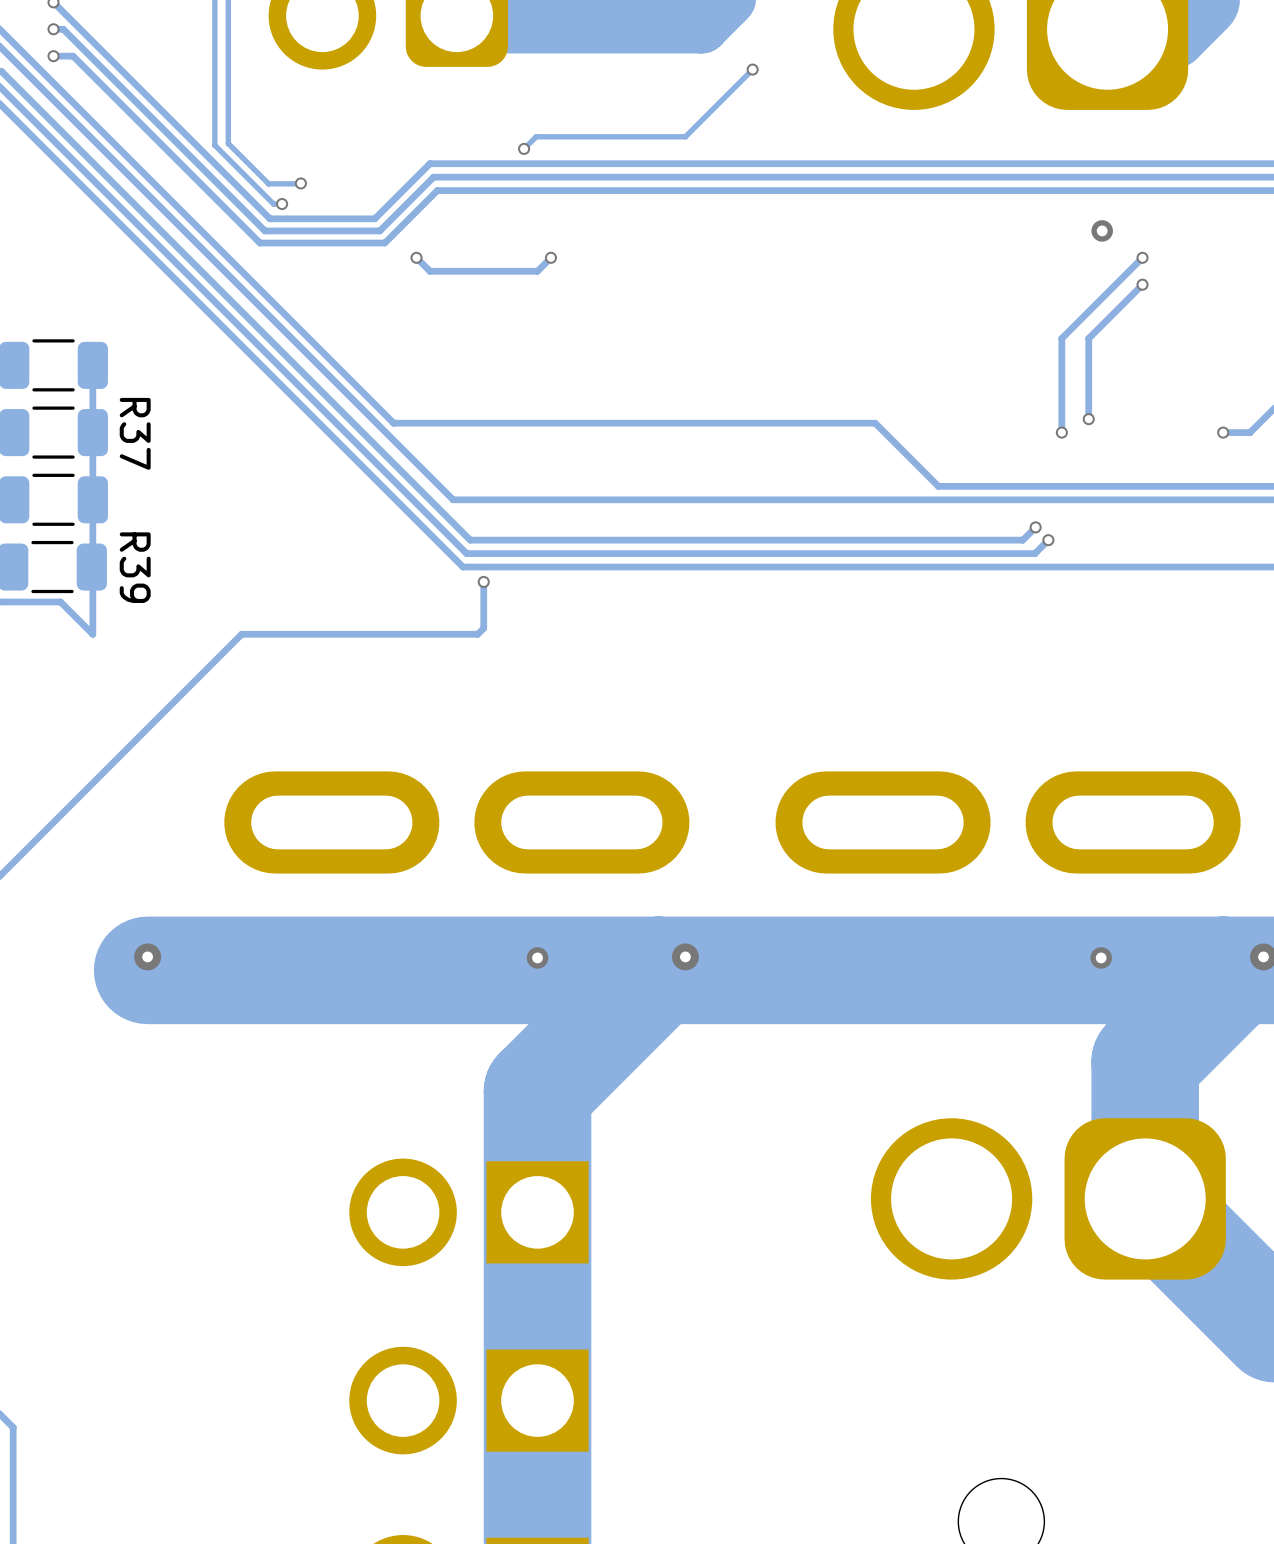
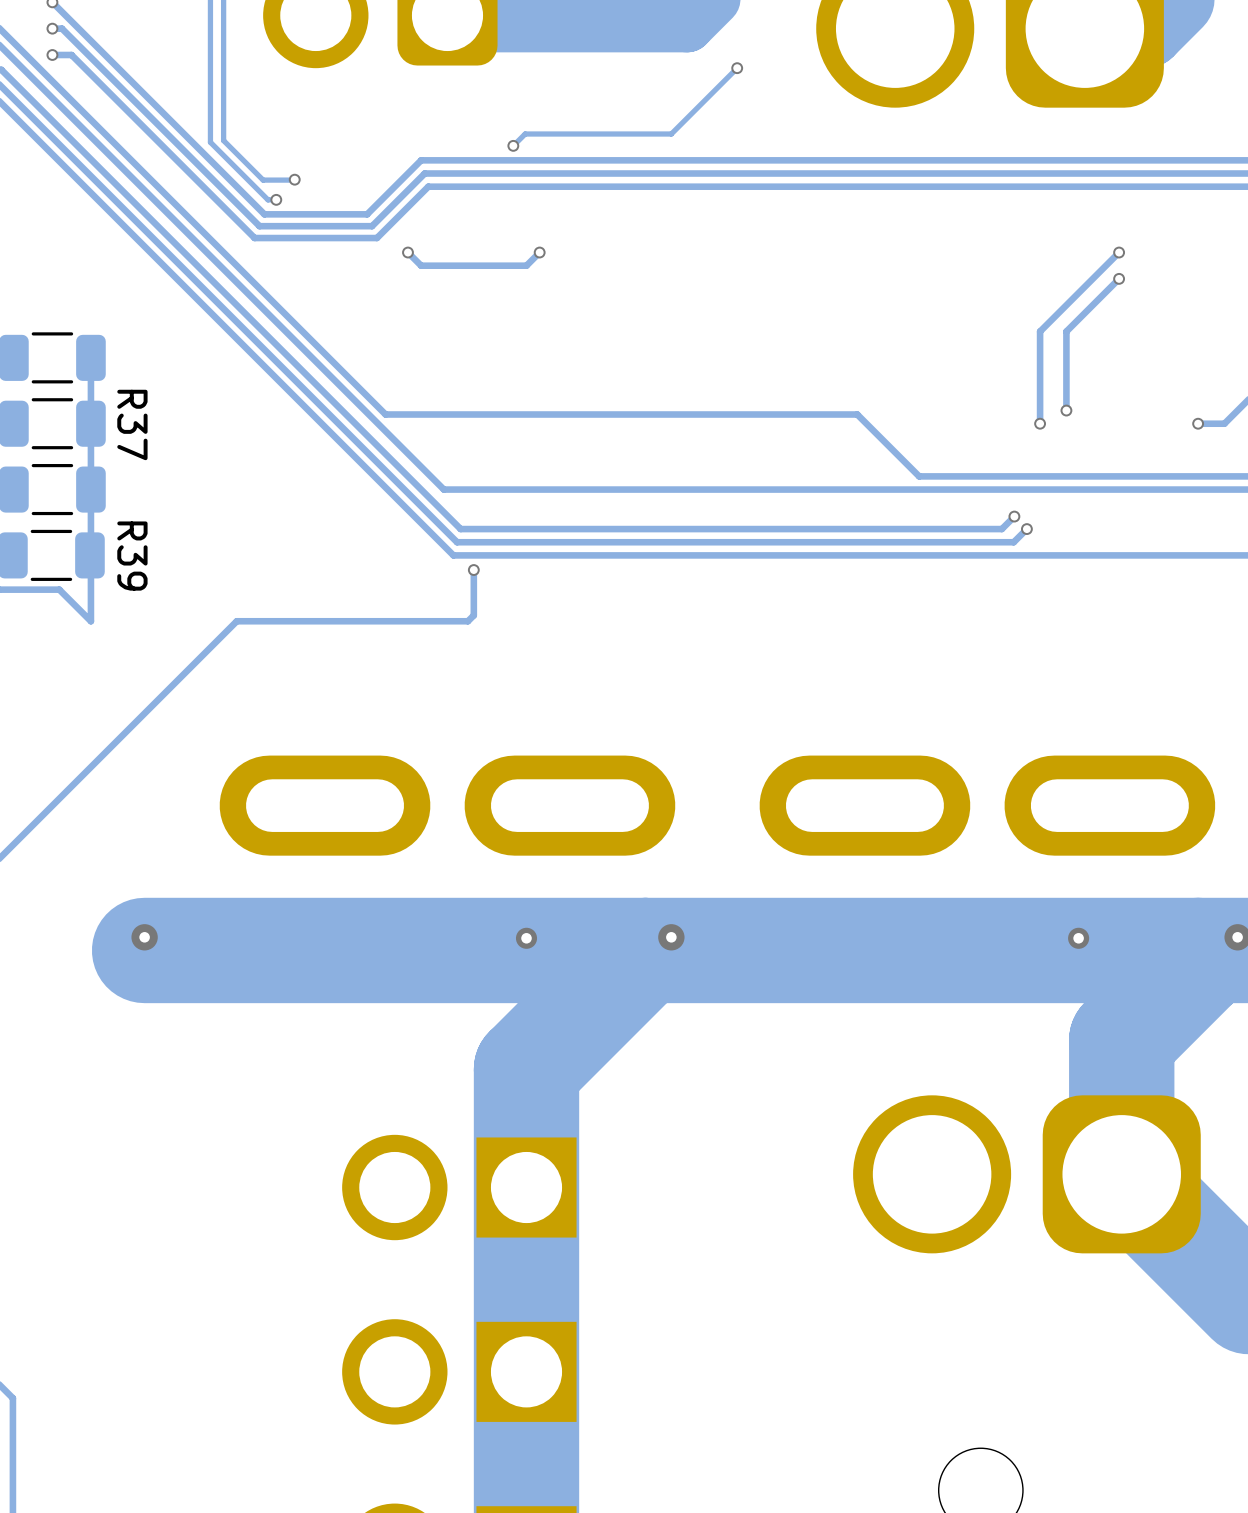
via: (1102, 230) -> none

